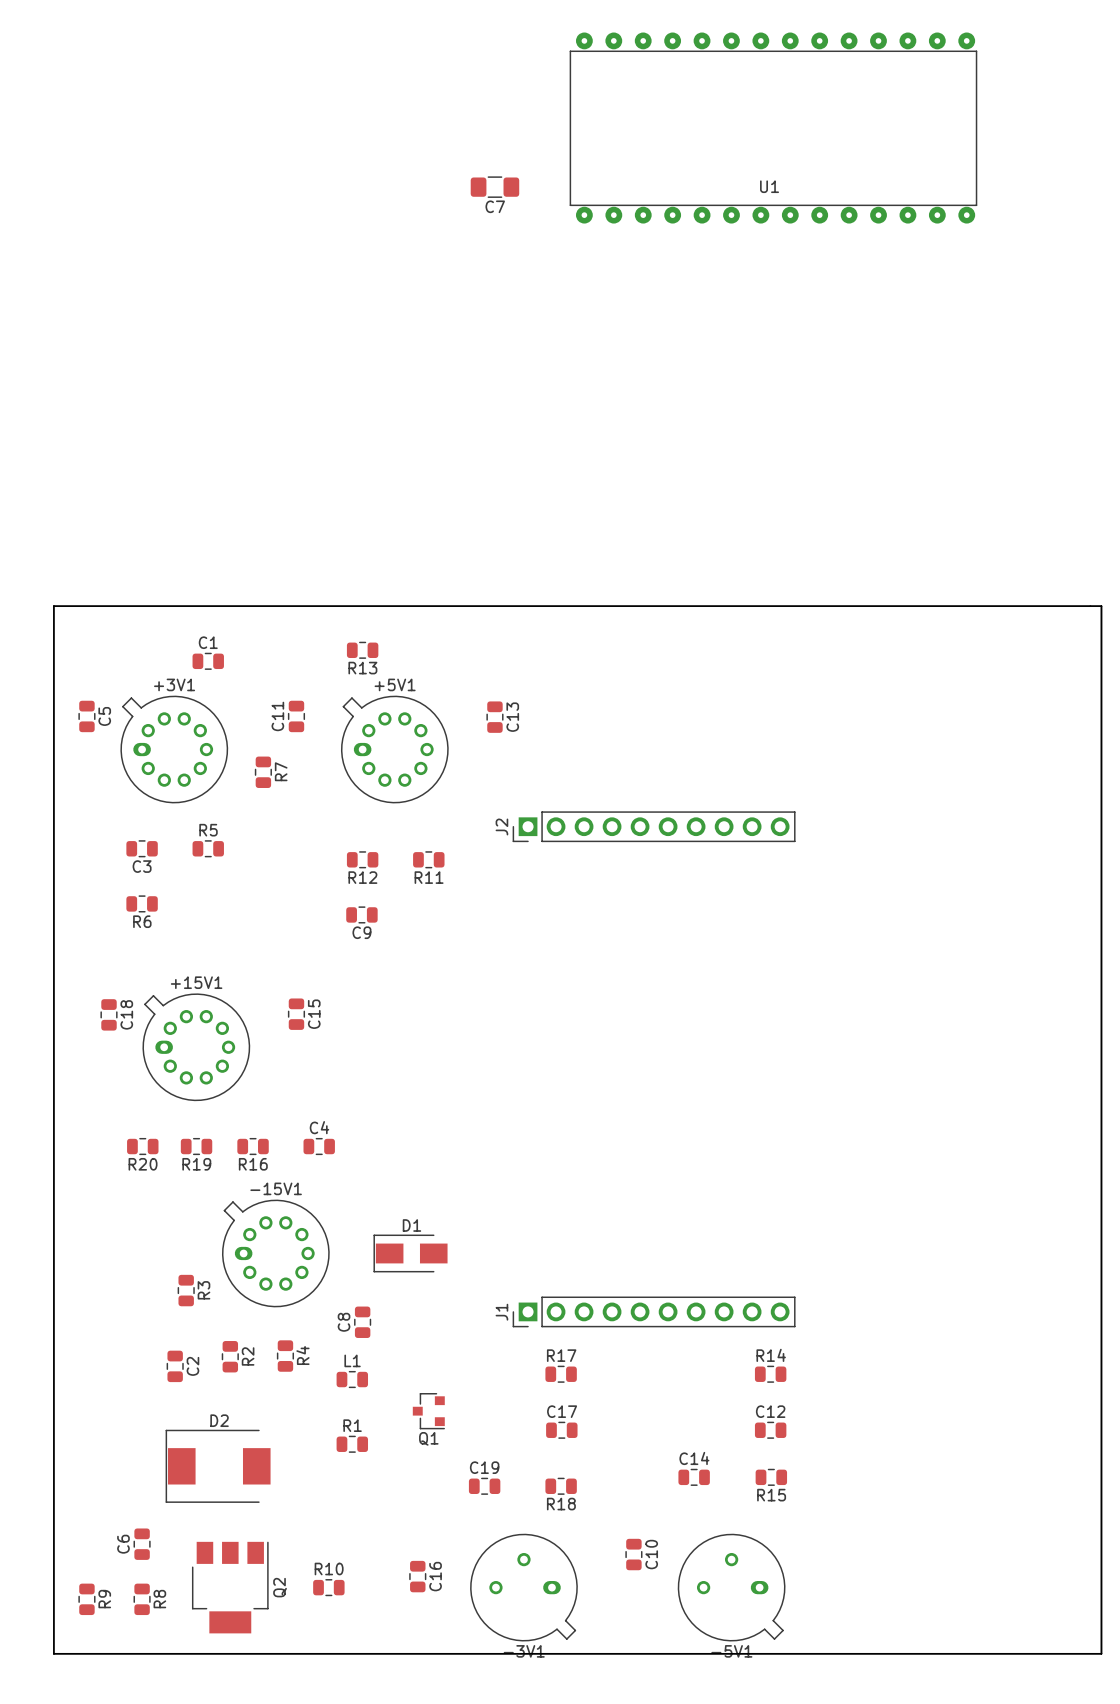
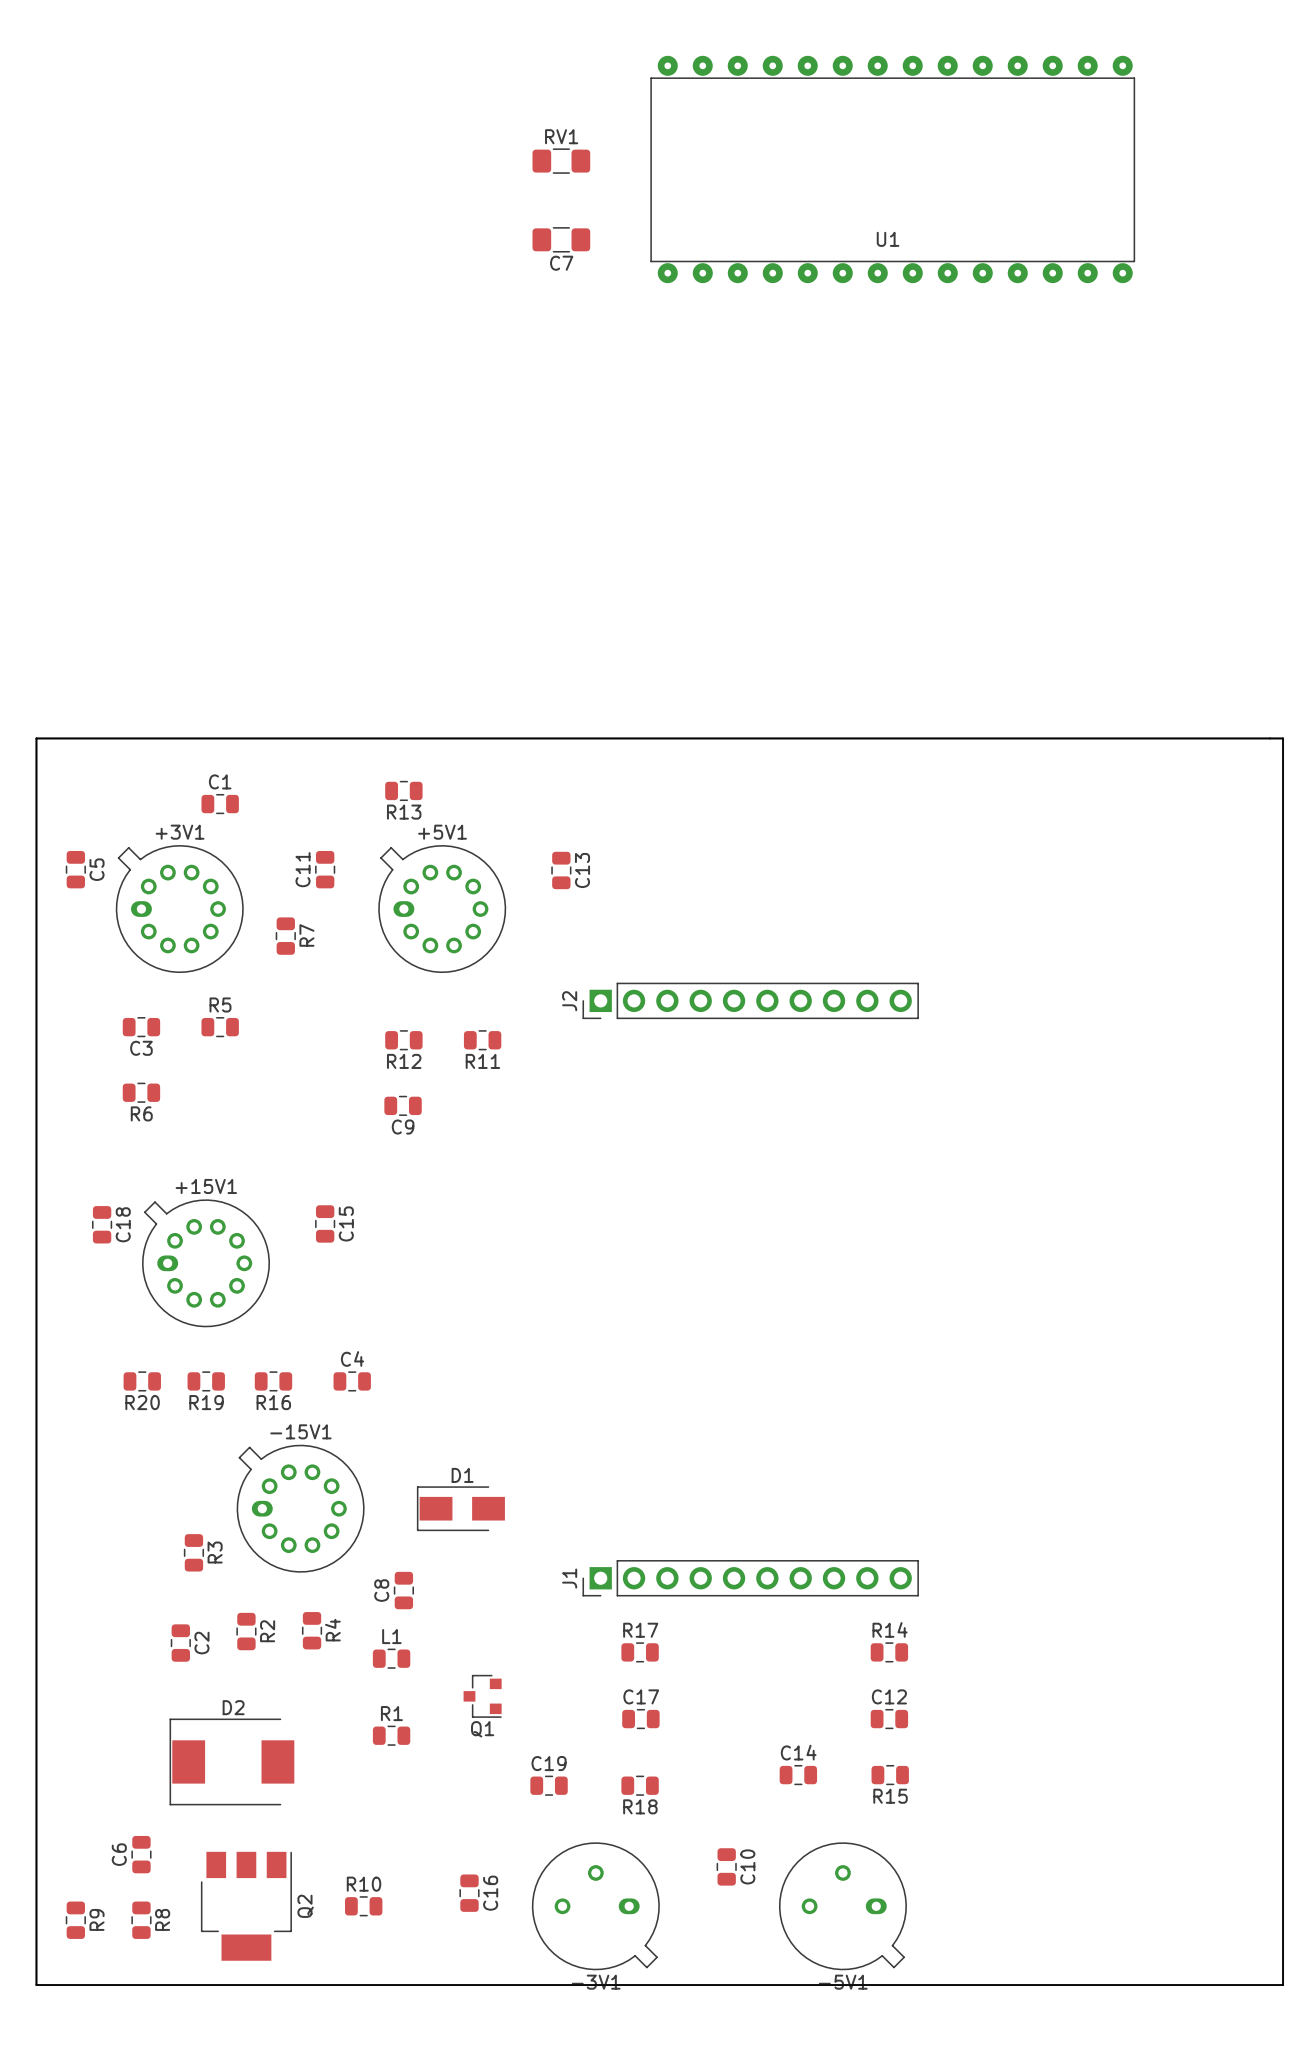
RV1: none -> (561, 161)

